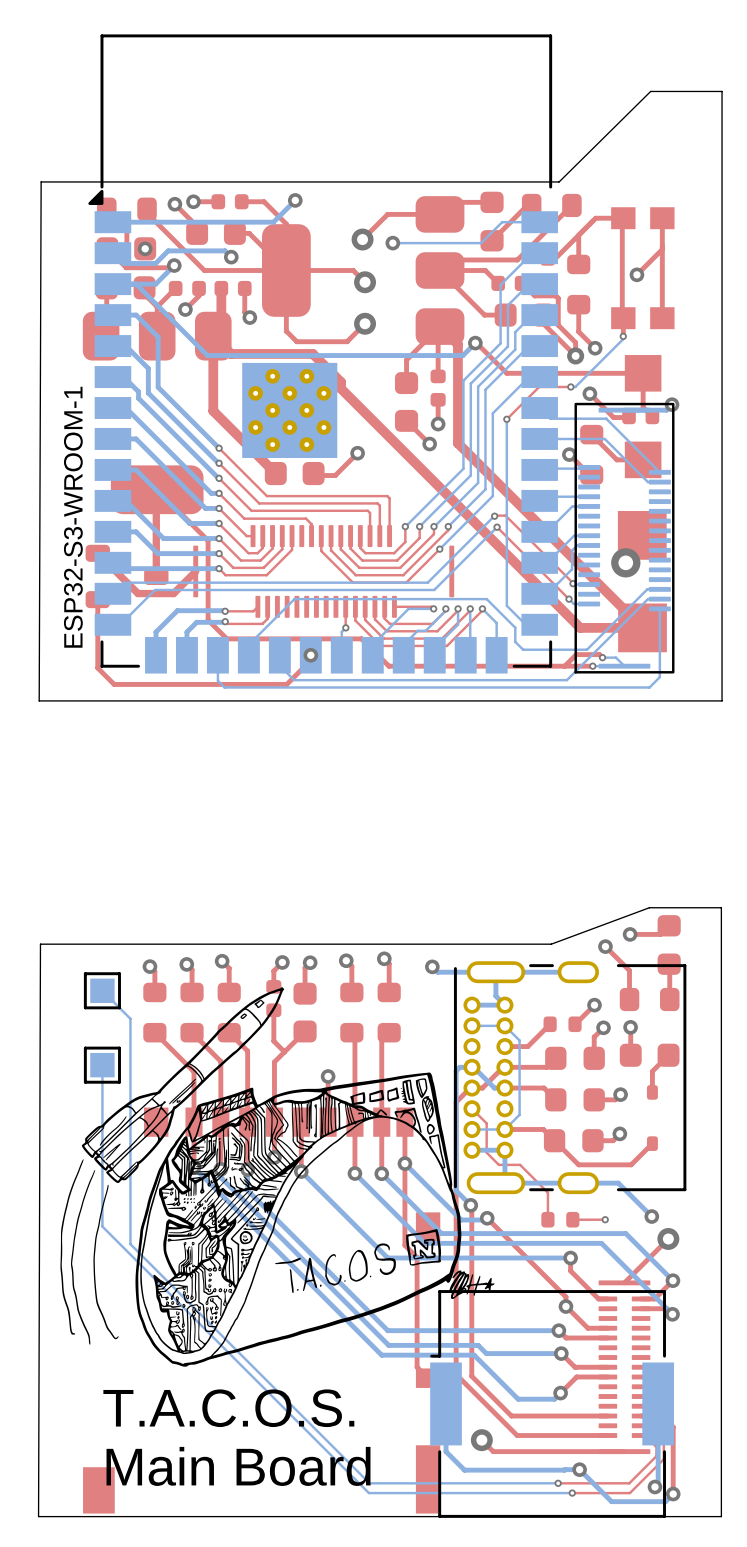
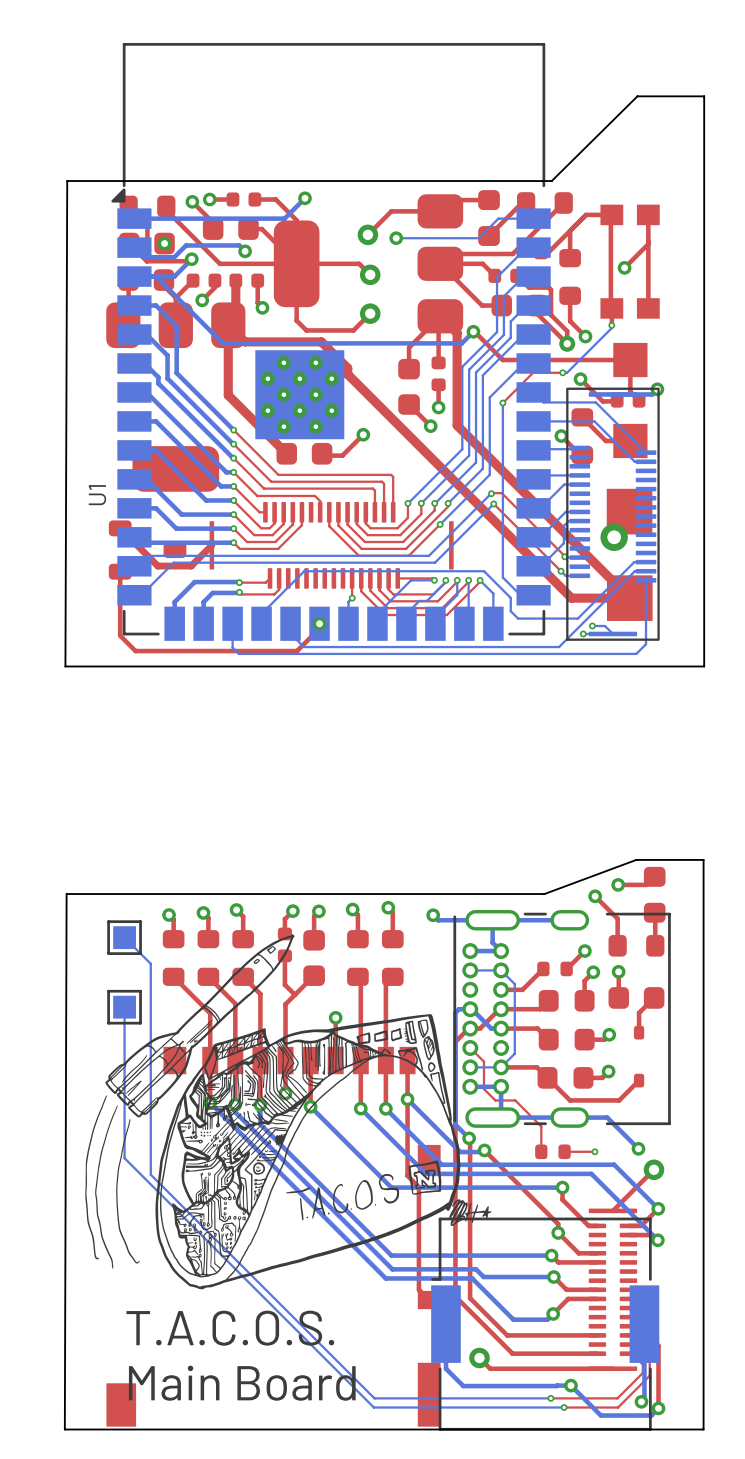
top track: (157, 489) (208, 540) (208, 620) (226, 638) (361, 638) (388, 666) (592, 666) -> none
top track: (156, 490) (156, 576) -> none
ESP32-S3-WROOM-1 name: ESP32-S3-WROOM-1 (73, 517) -> U1 (97, 495)
top track: (602, 657) (599, 654) (576, 654) (564, 666) -> none

